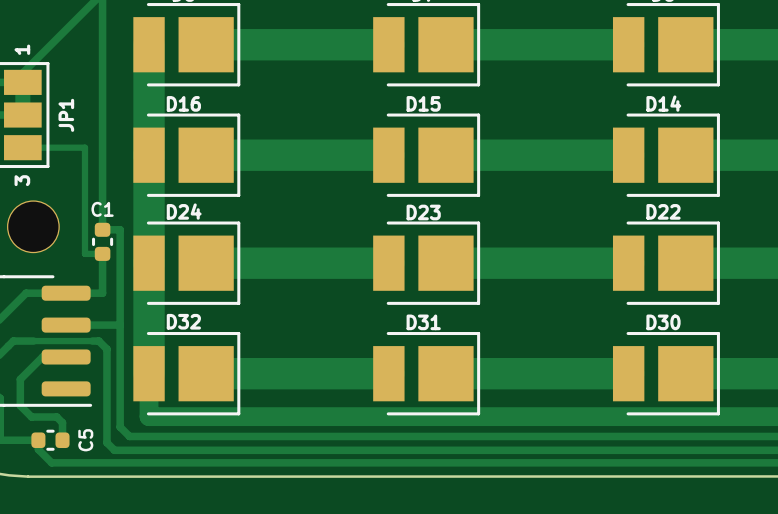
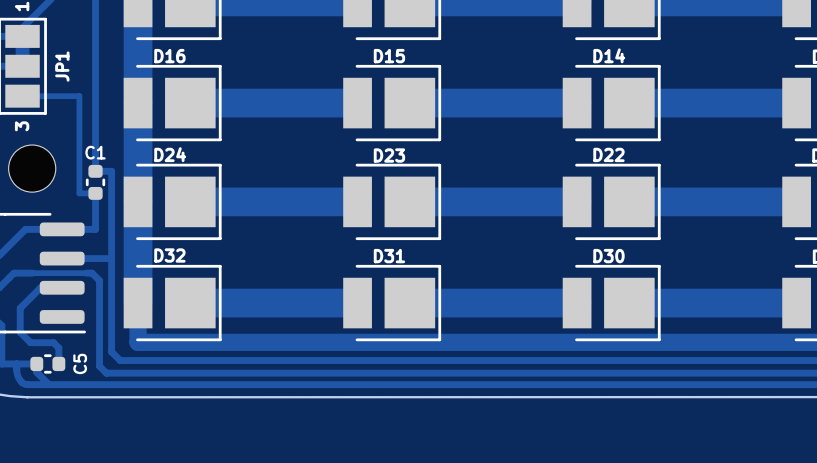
track: none -> (16, 363) (17, 374) (23, 383) (48, 384)

